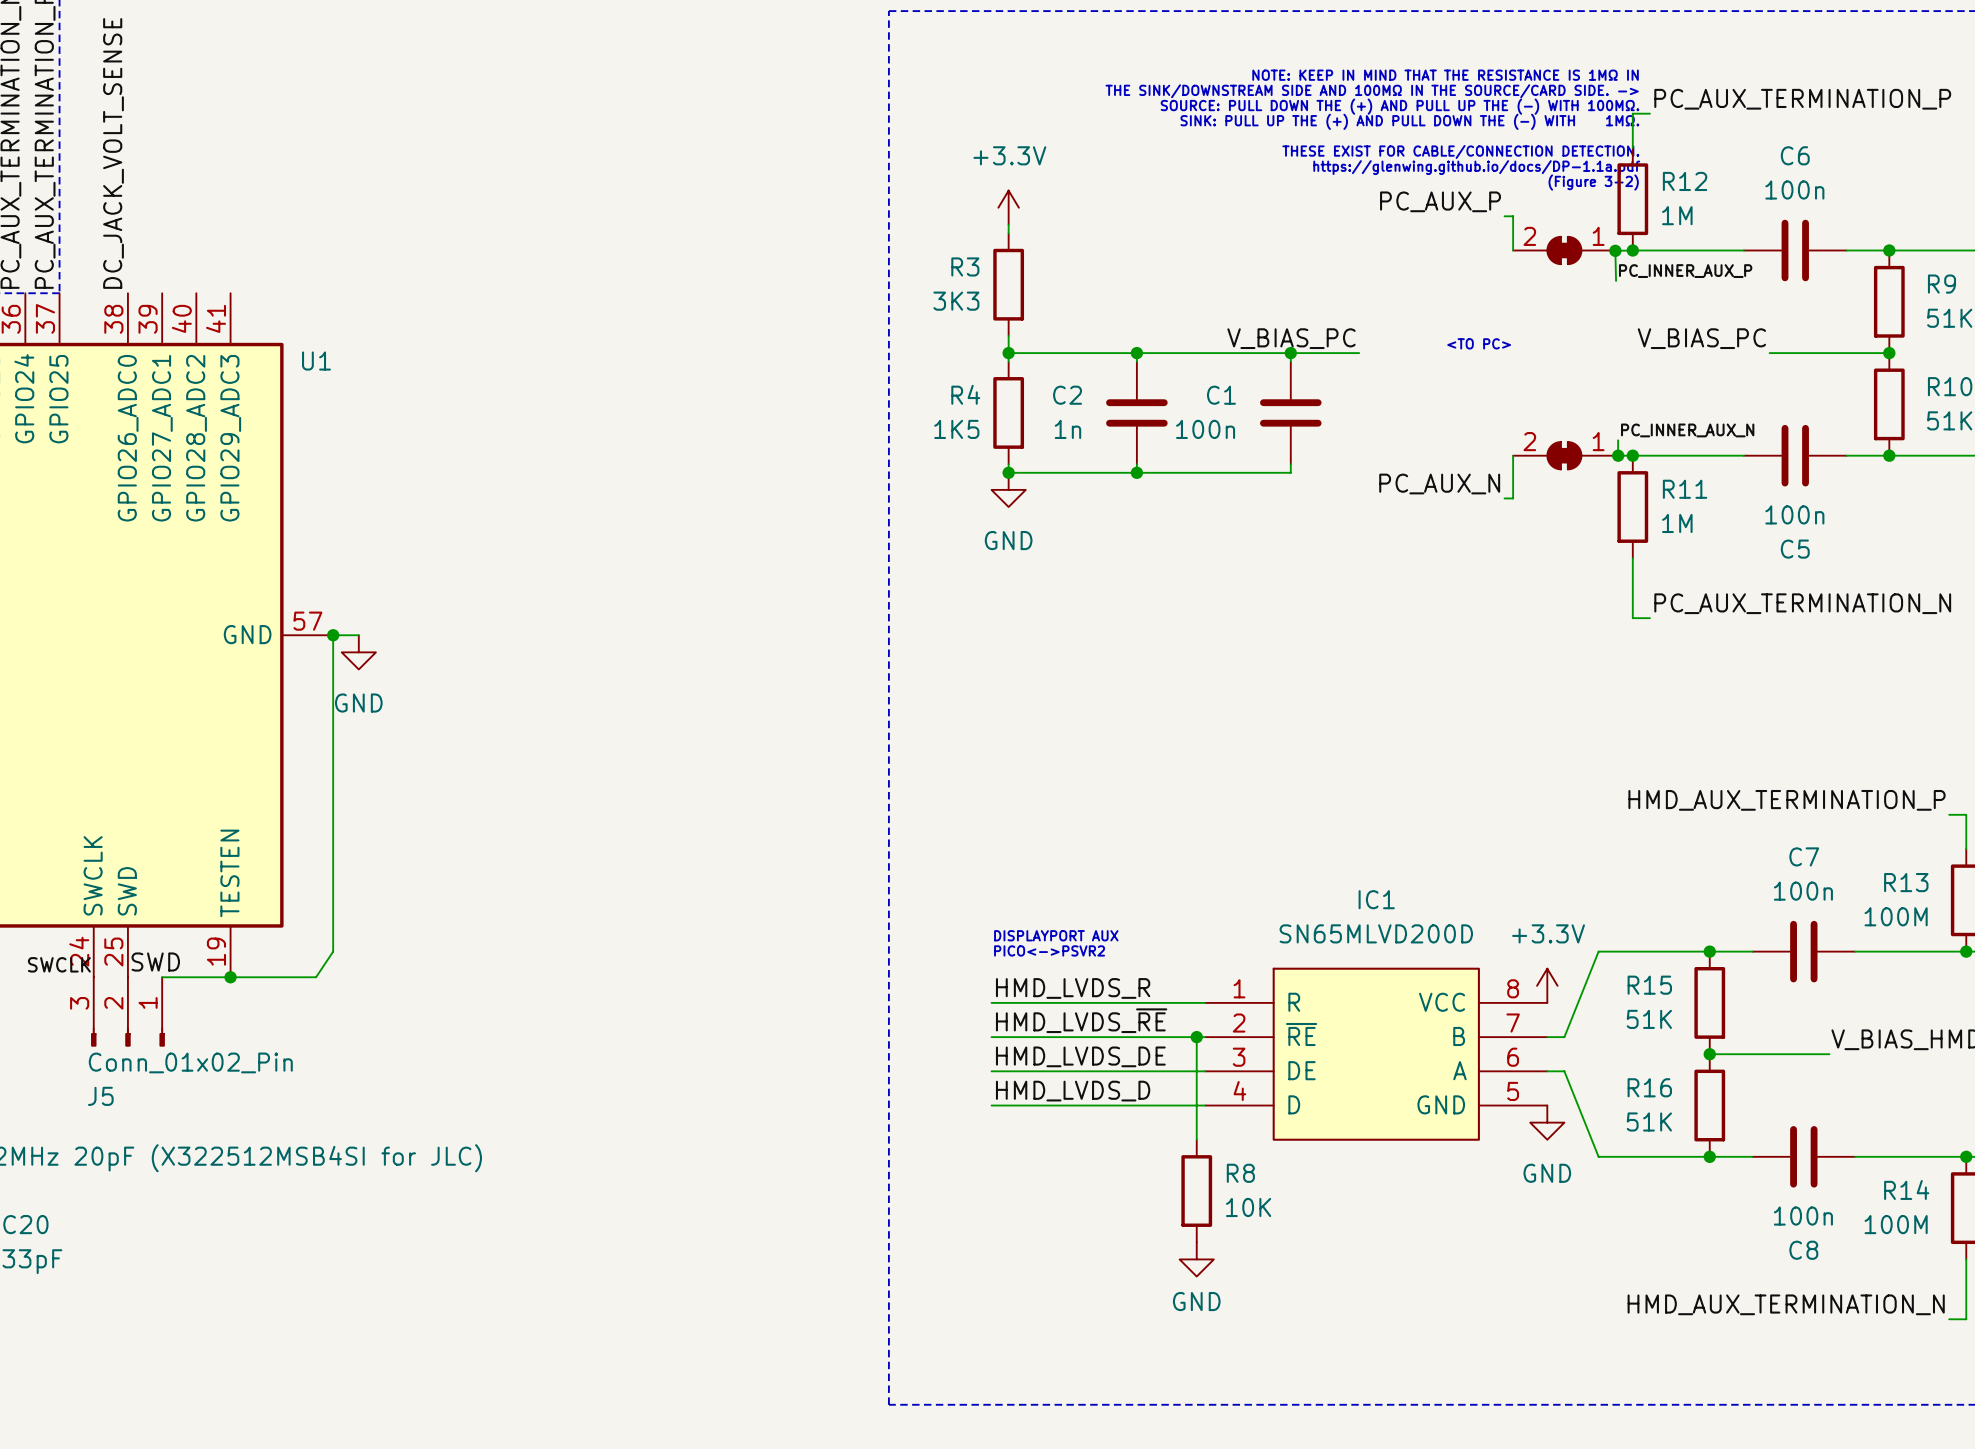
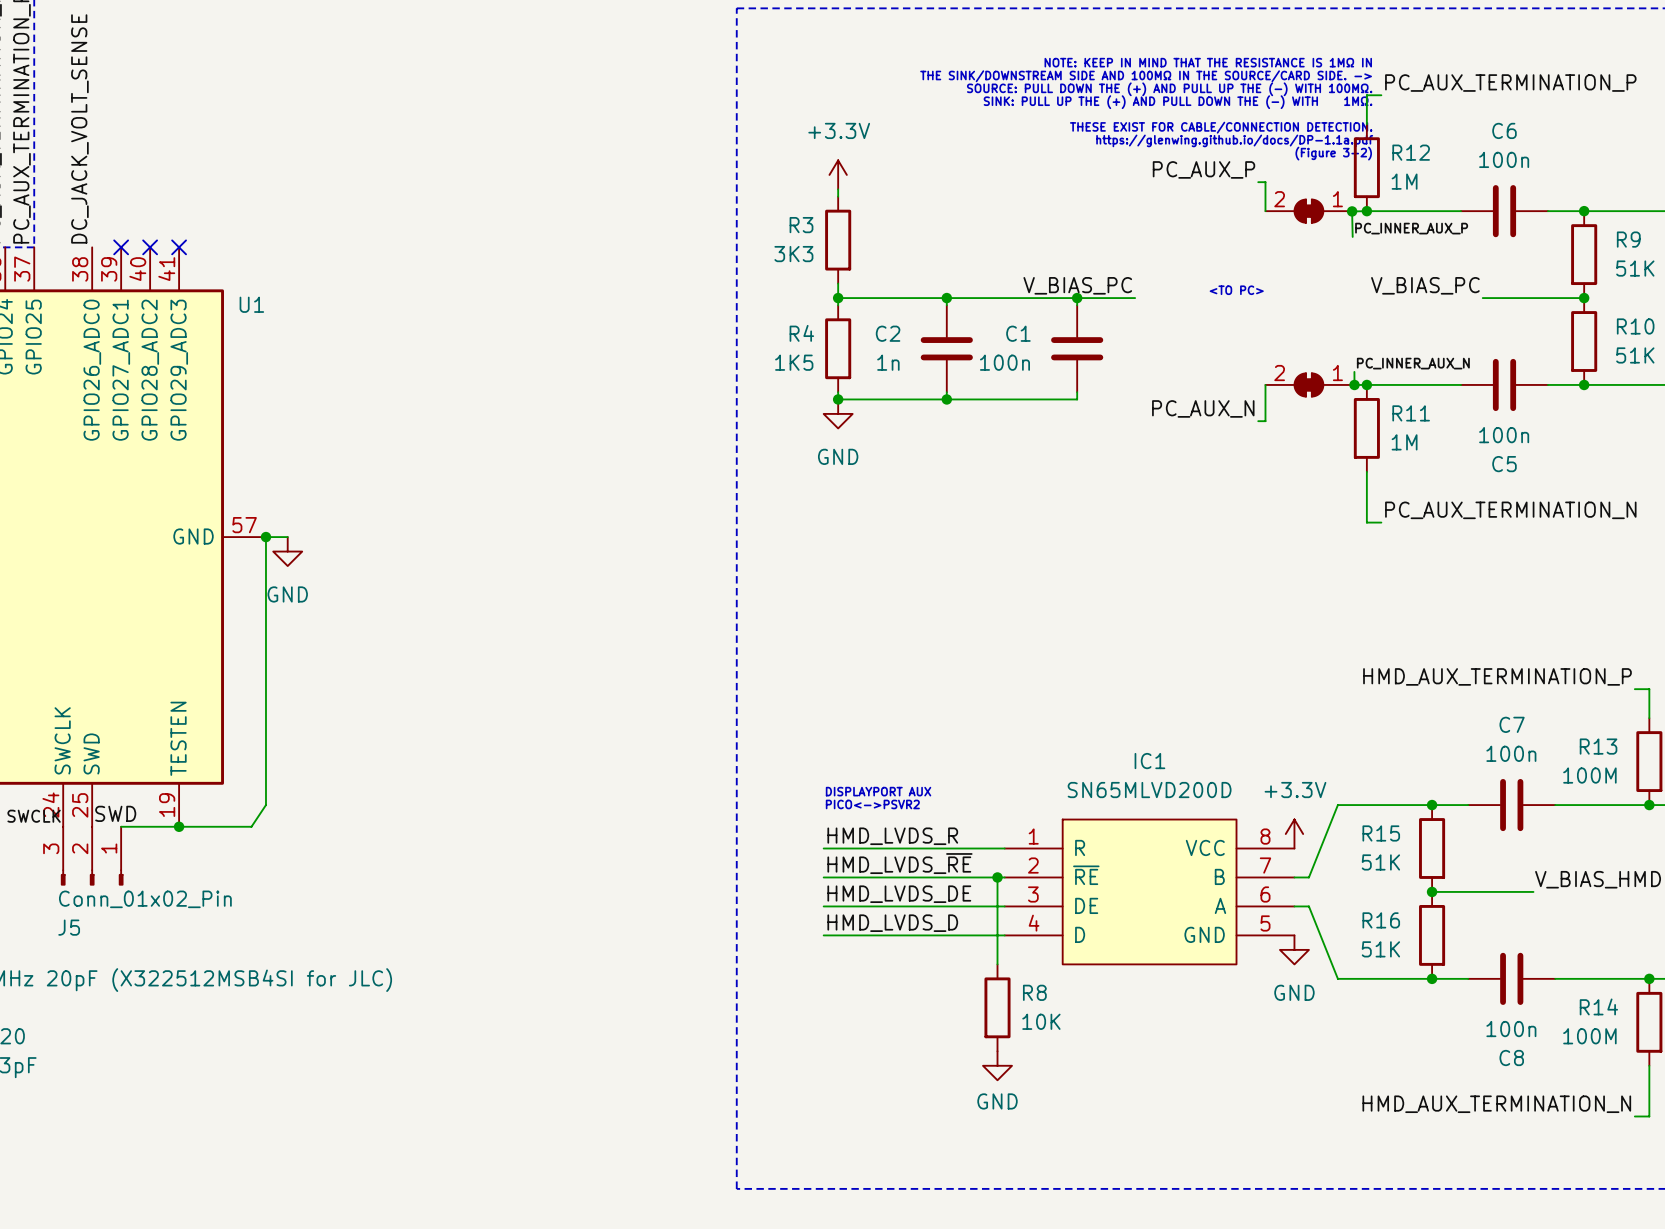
no-connect mark: none -> (121, 247)
no-connect mark: none -> (150, 247)
no-connect mark: none -> (179, 247)

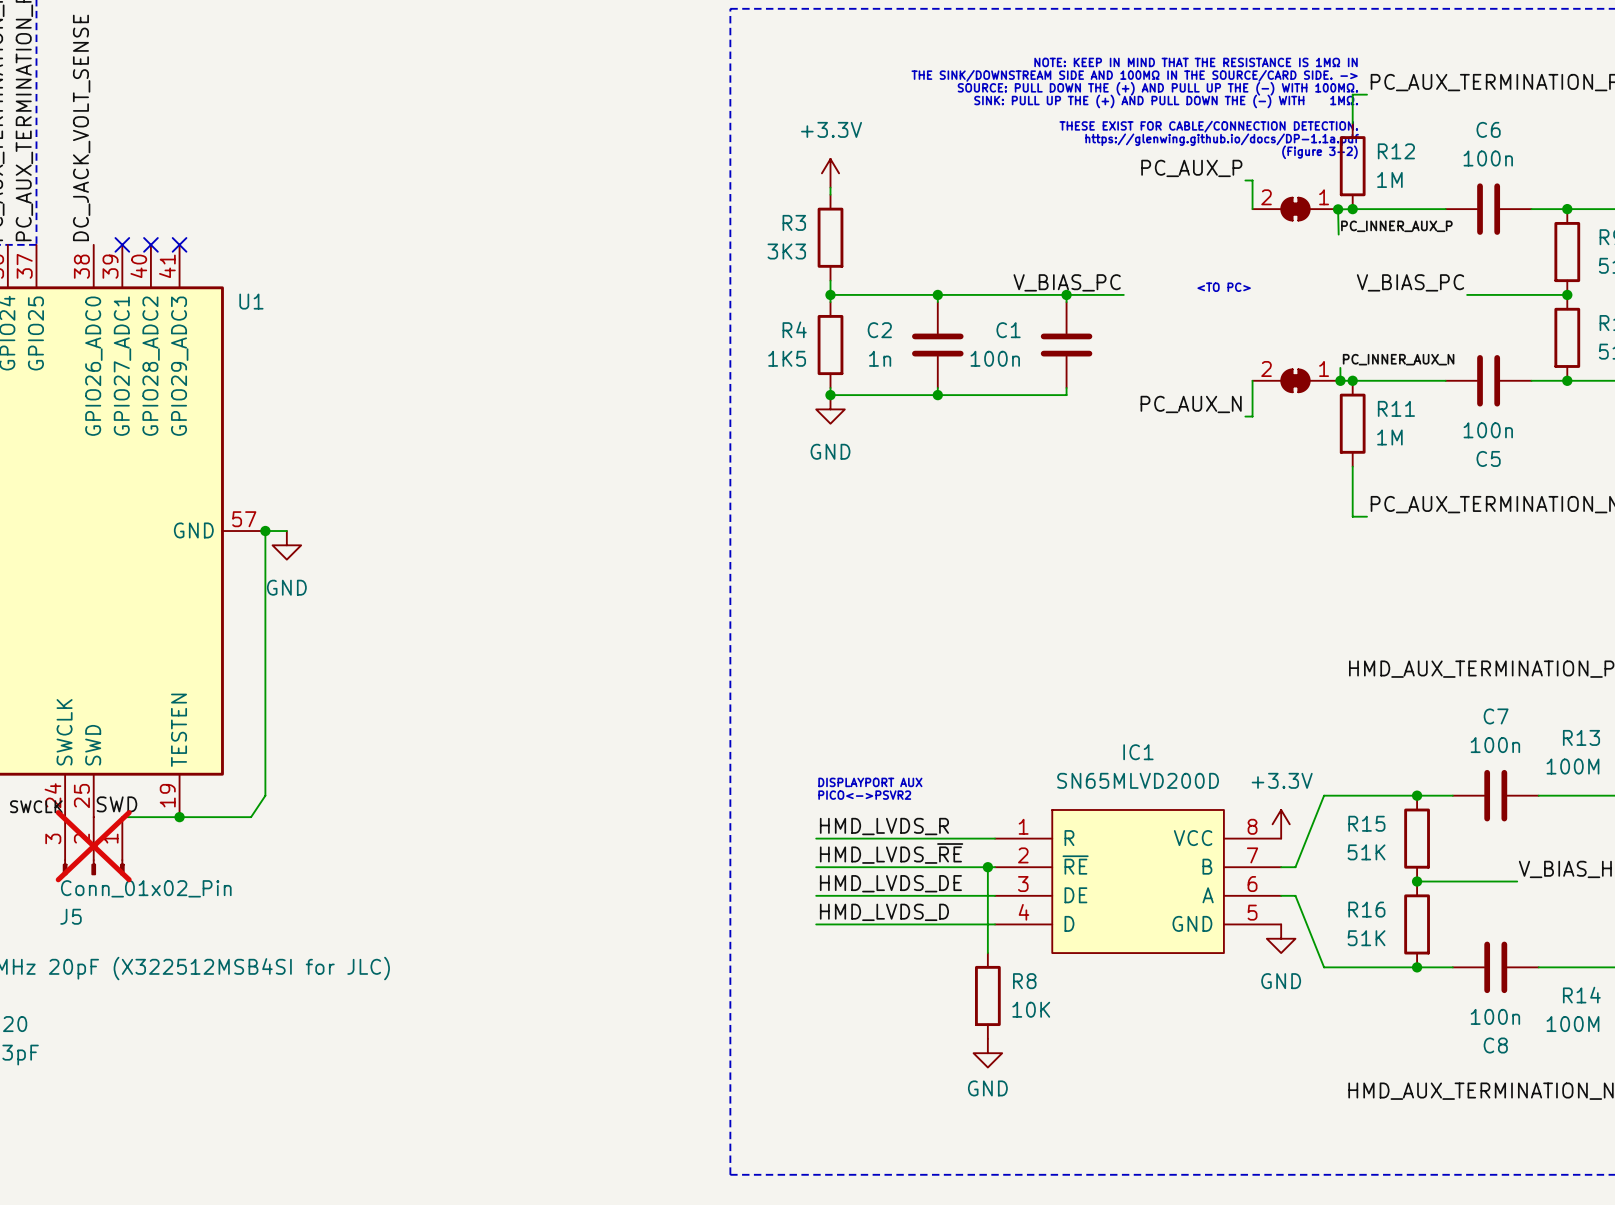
J5 do-not-place cross: none -> (93, 846)

